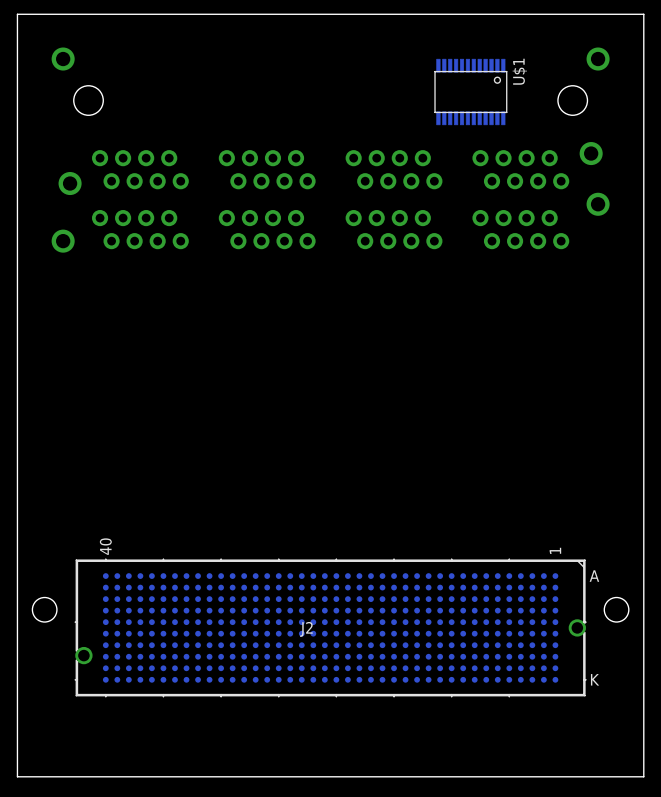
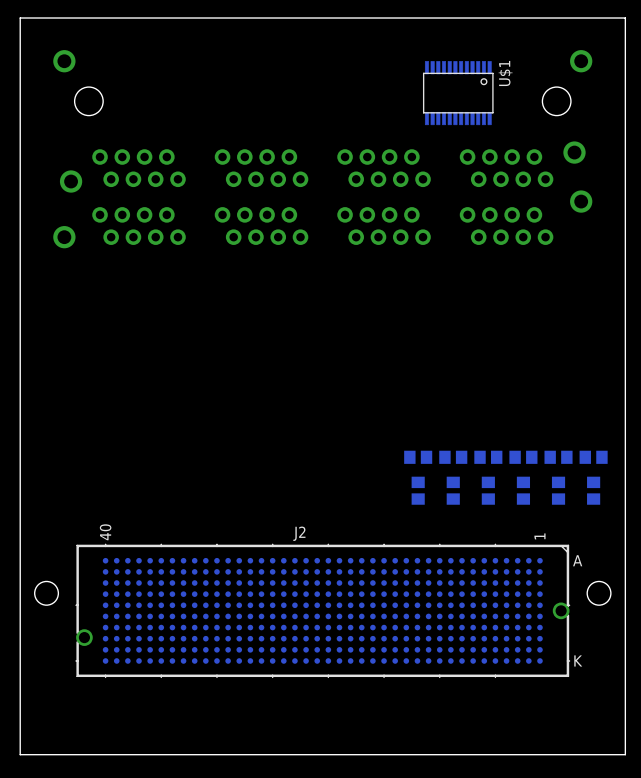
part: none -> (418, 457)
part: none -> (453, 457)
part: none -> (488, 457)
part: none -> (523, 457)
part: none -> (558, 457)
part: none -> (593, 457)
part: none -> (418, 490)
part: none -> (453, 490)
part: none -> (488, 490)
part: none -> (523, 490)
part: none -> (558, 490)
part: none -> (593, 490)
J2 name position: J2 (306, 629) -> J2 (299, 533)

